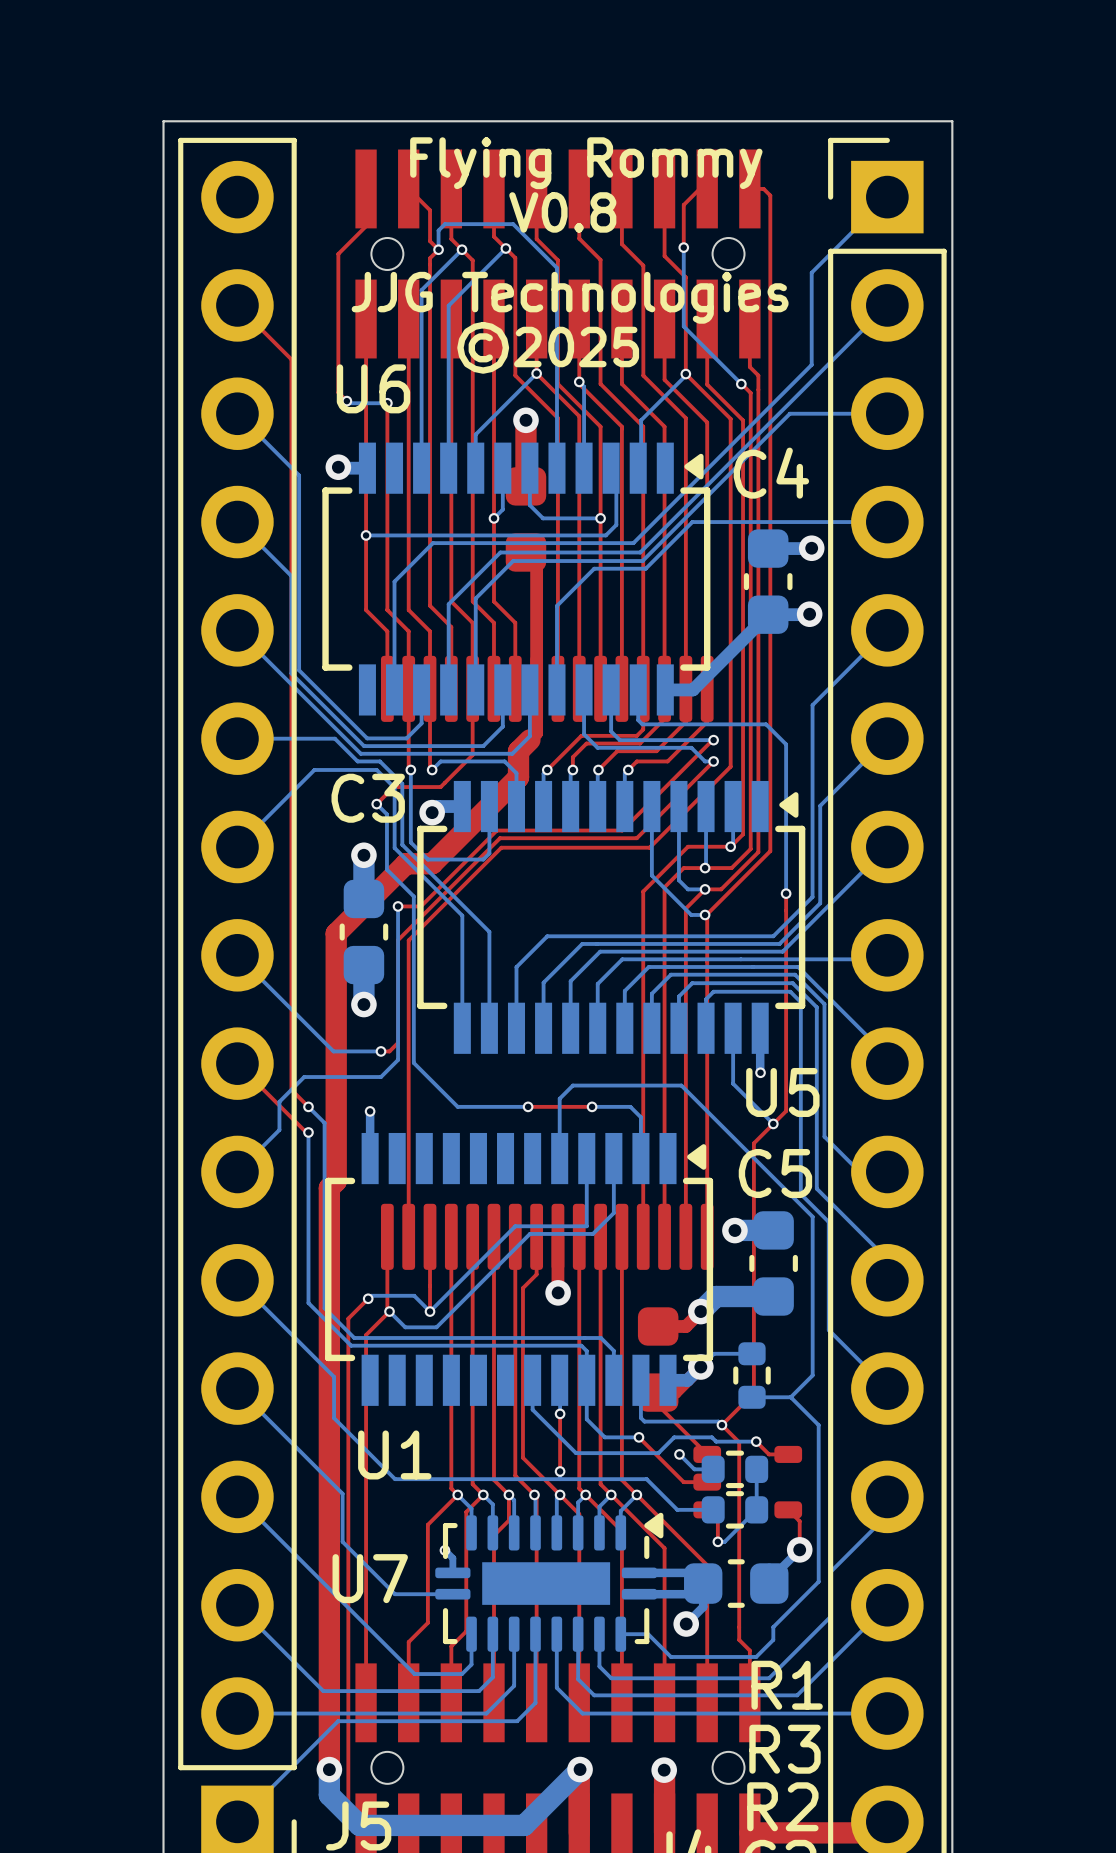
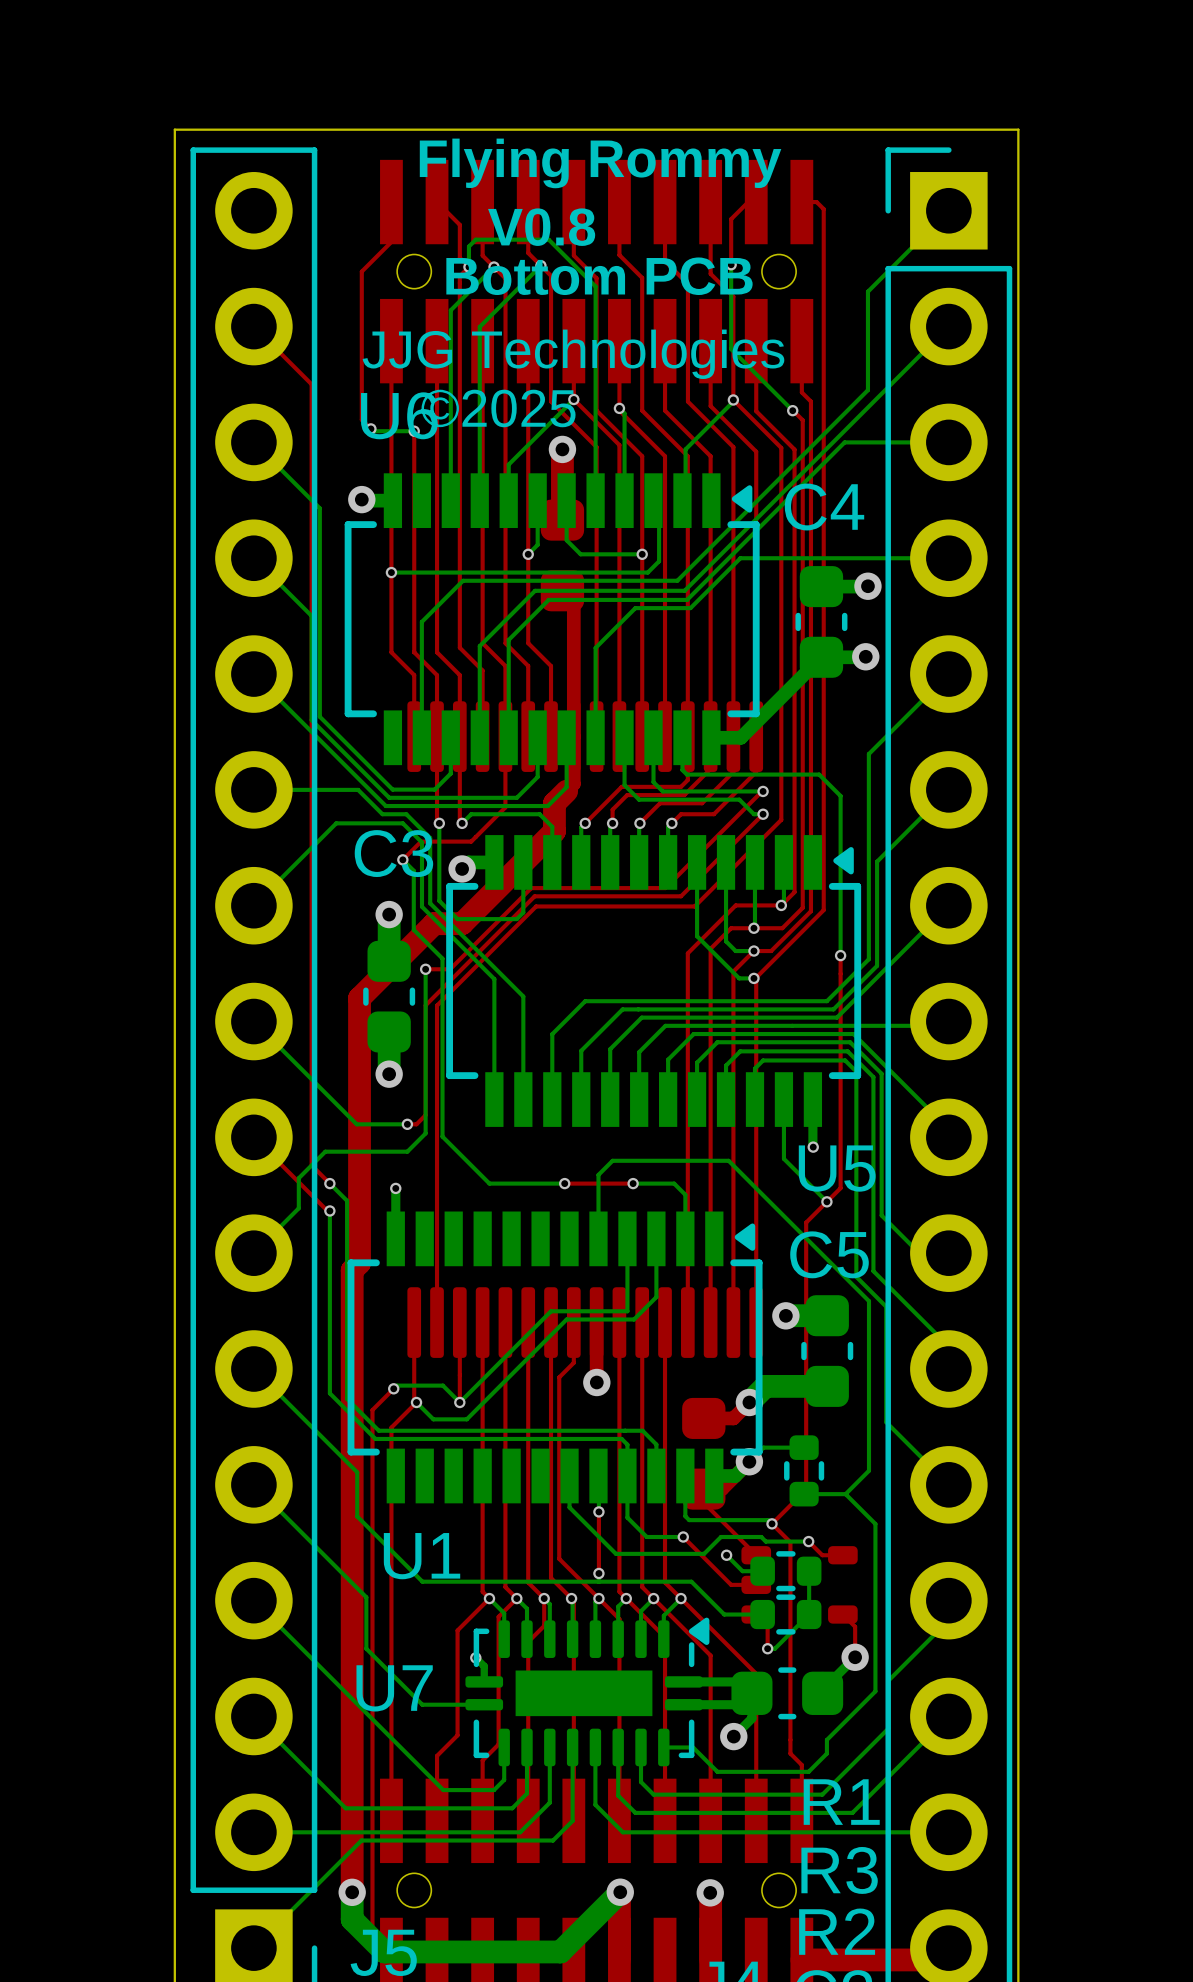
text position: Flying Rommy (586, 163) -> Flying Rommy (600, 163)
text: none -> Bottom PCB (599, 276)
text position: JJG Technologies (570, 297) -> JJG Technologies (573, 354)
text position: ©2025 (548, 347) -> ©2025 (498, 408)

